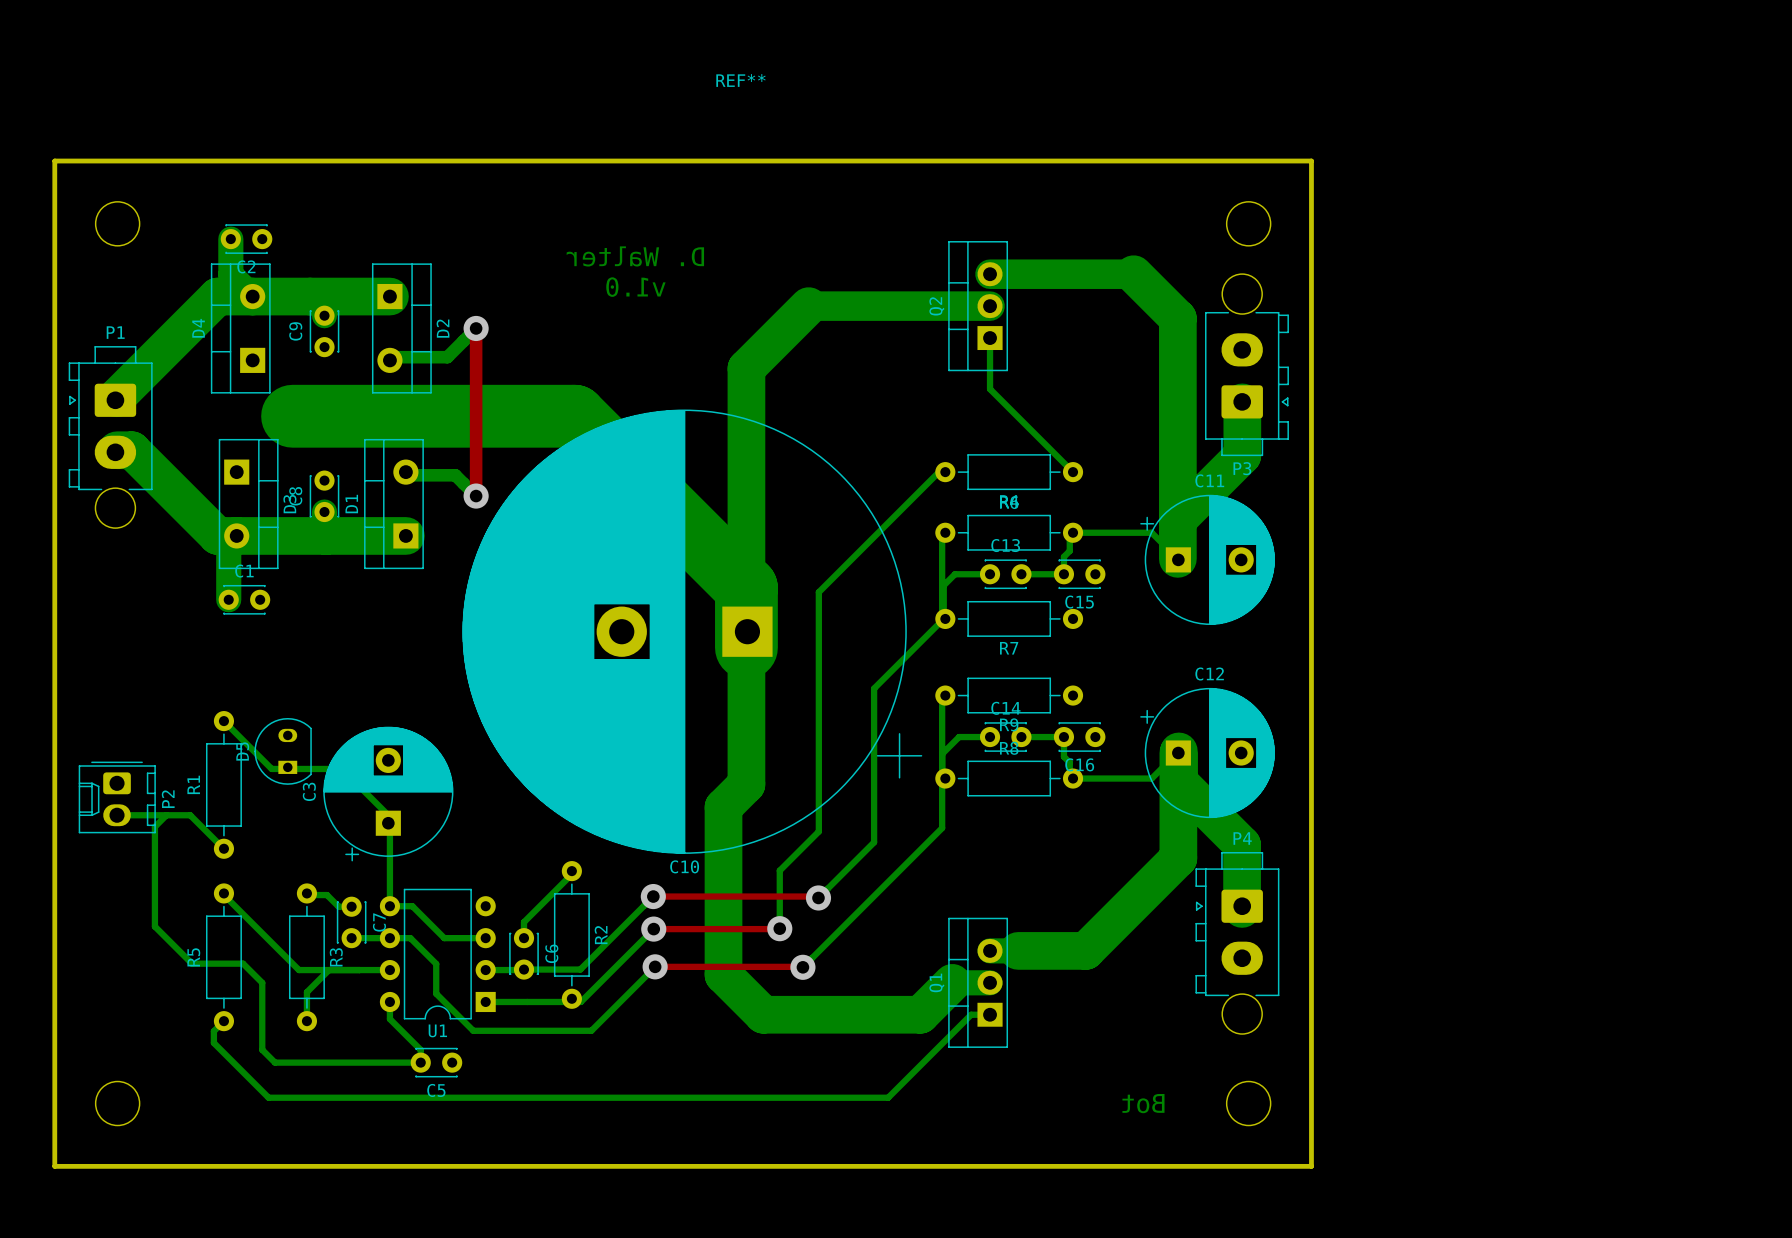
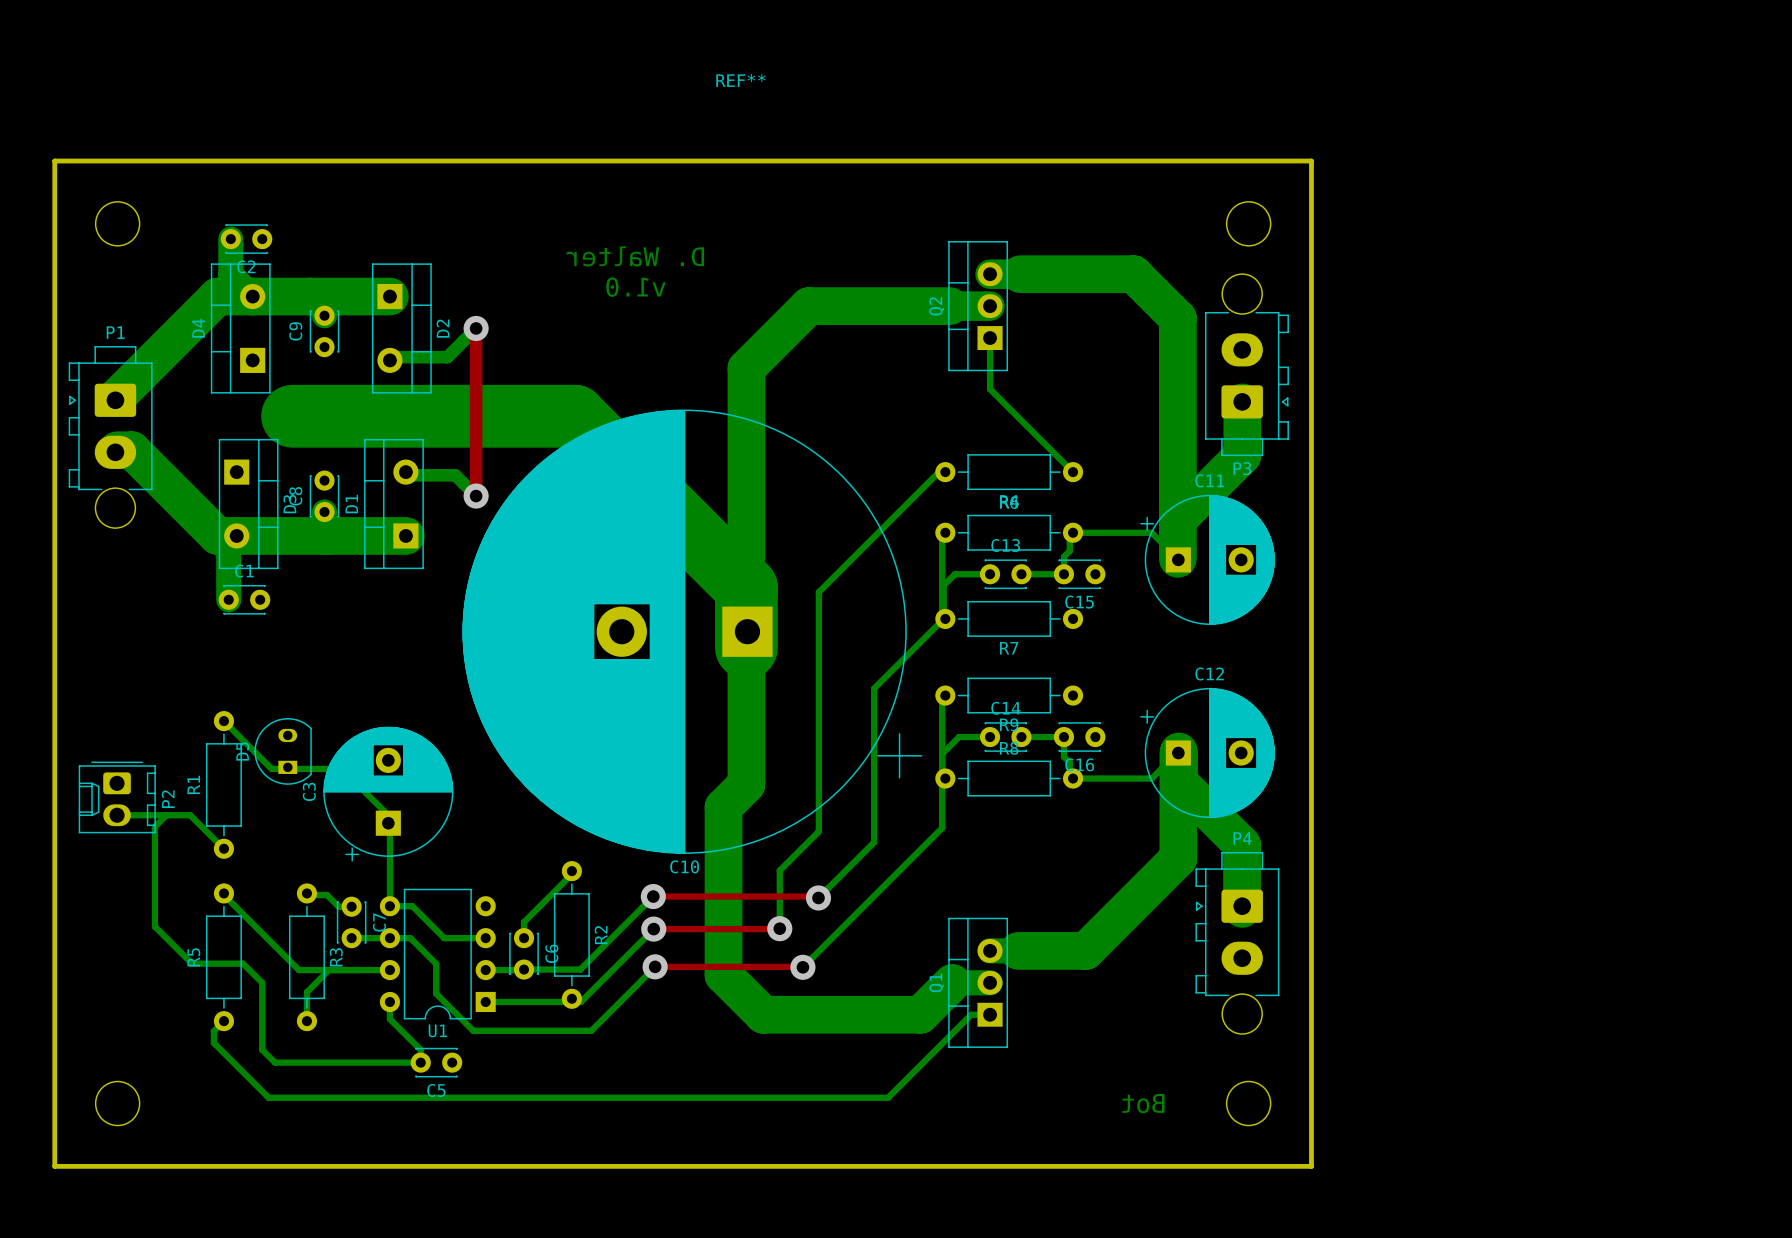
bottom track width: thin (1020, 274) (1133, 274) -> thick (1020, 274) (1133, 274)
bottom track width: thin (808, 306) (950, 306) -> thick (808, 306) (950, 306)

